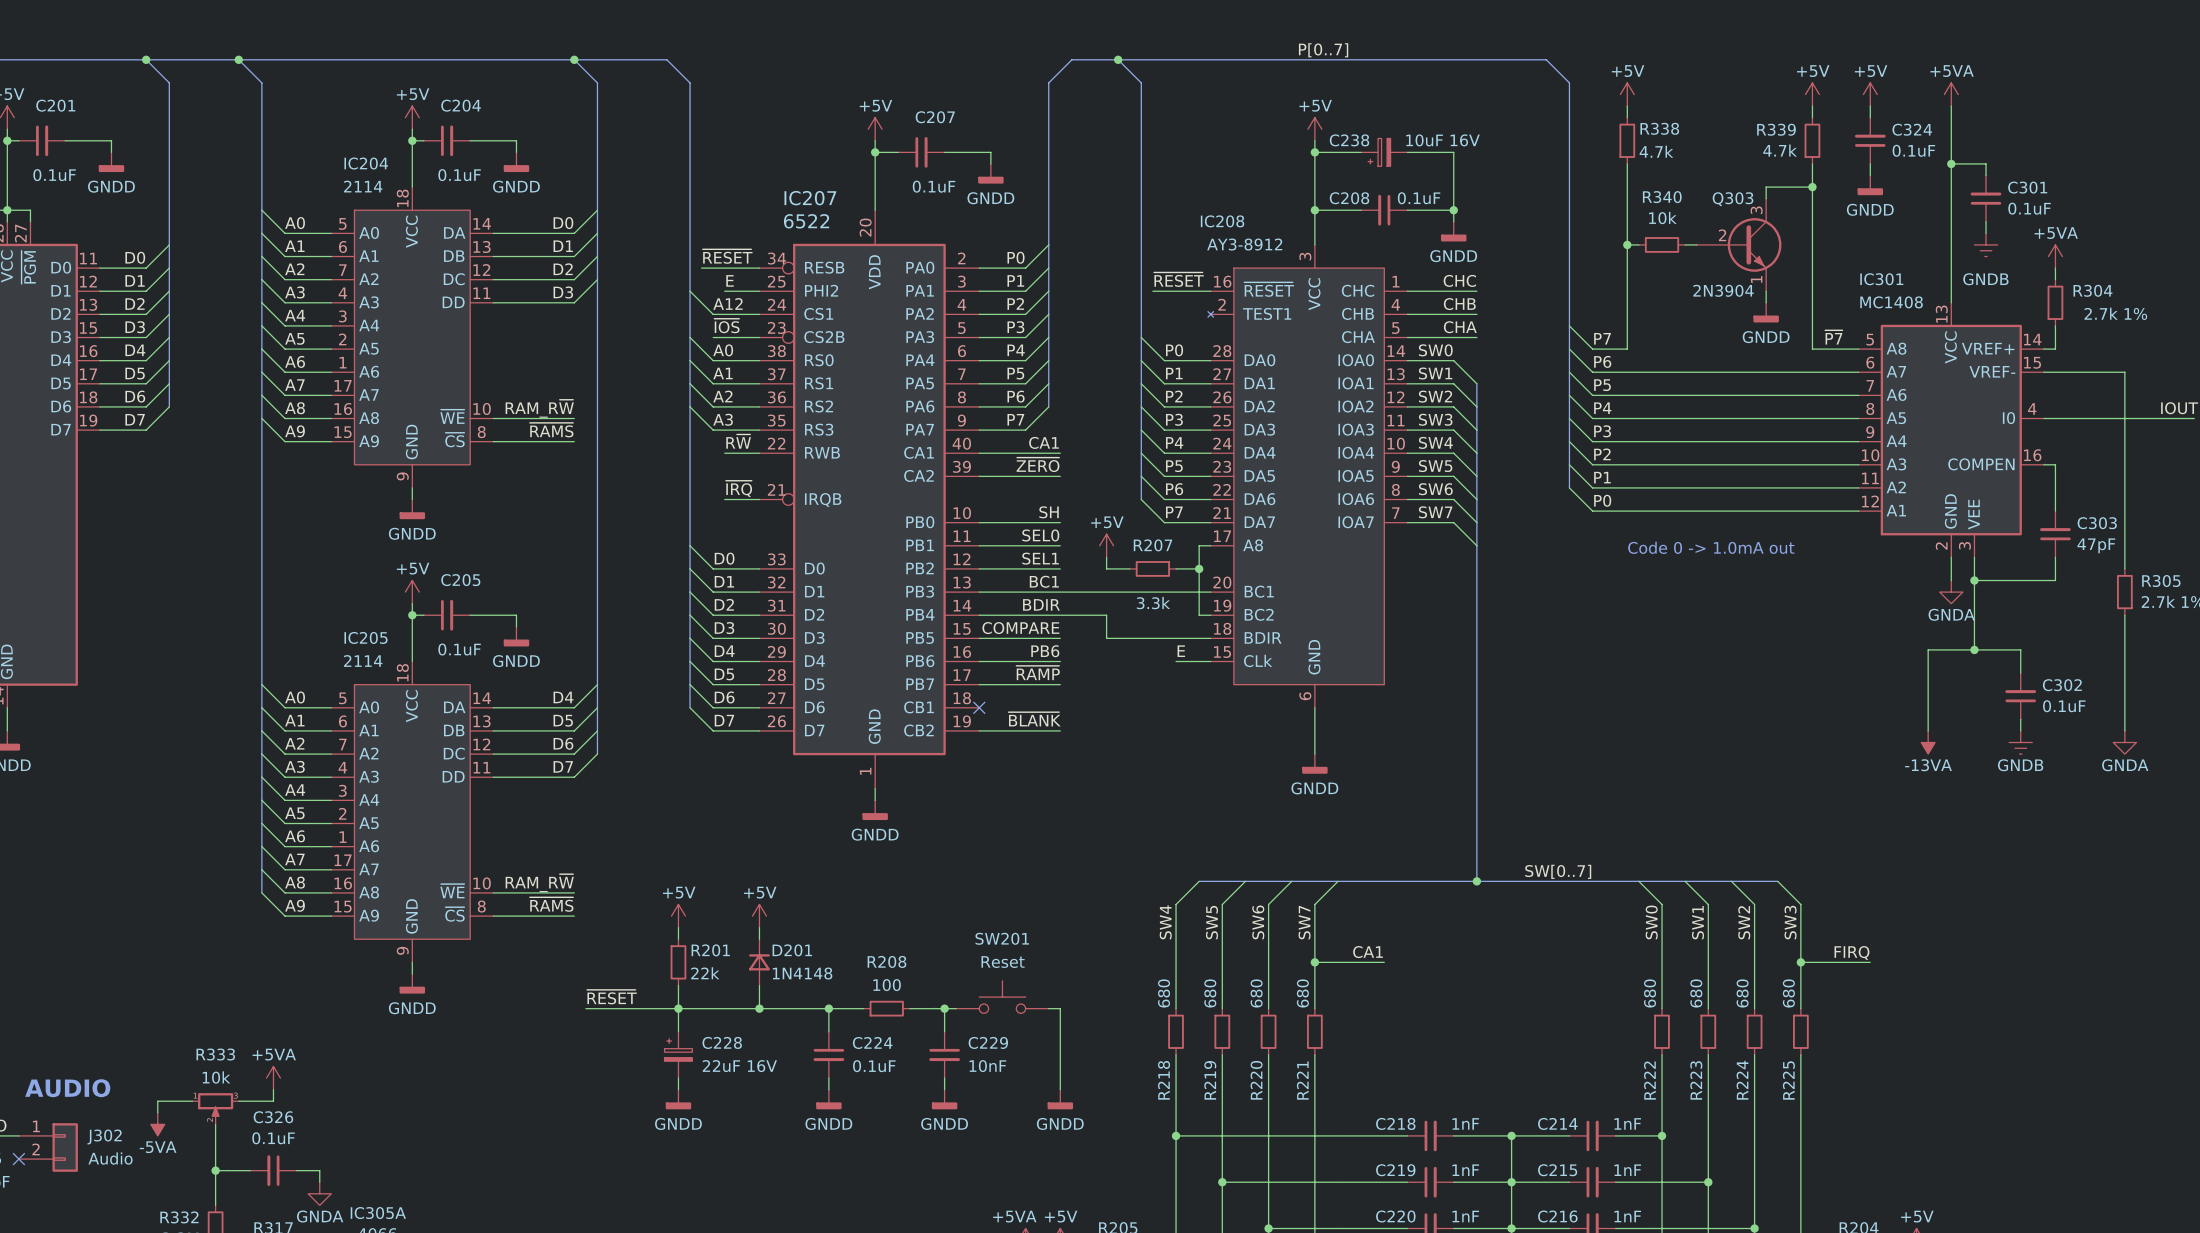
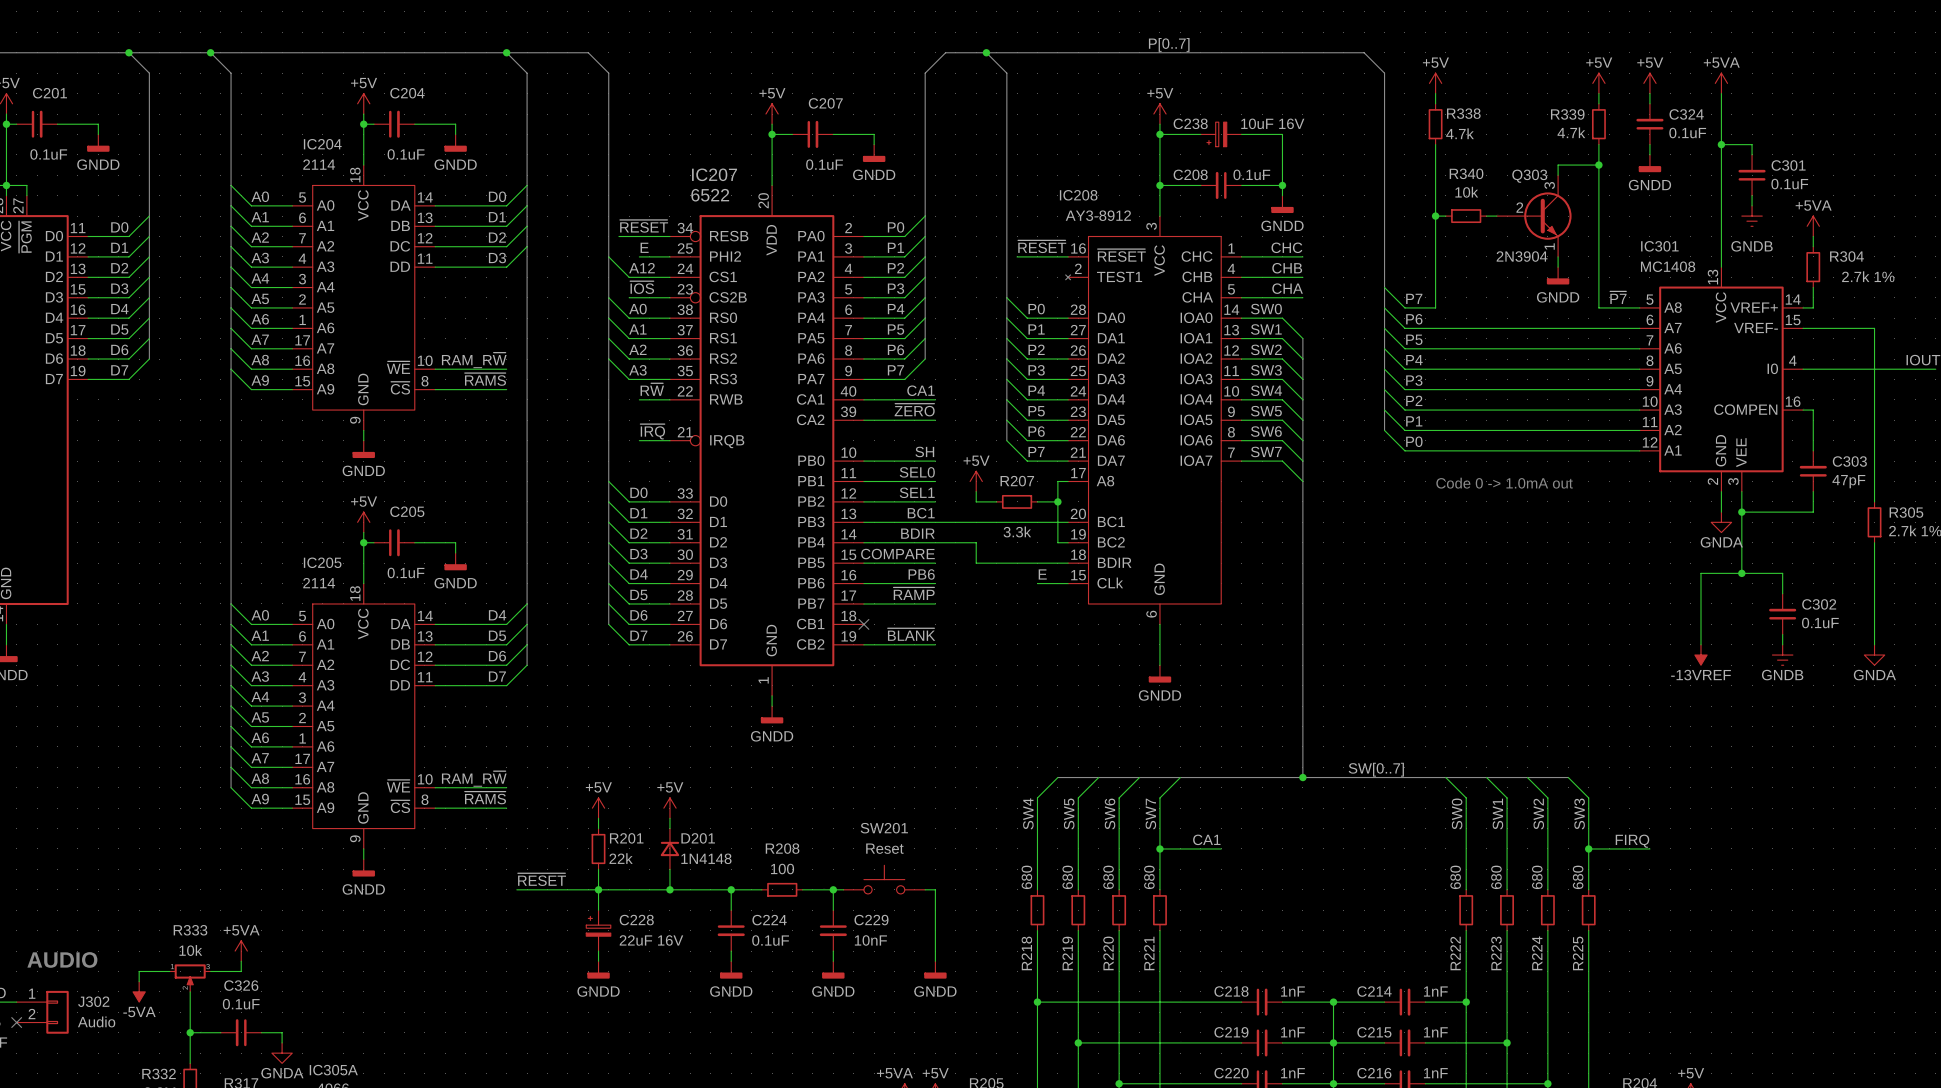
power symbol: -13VA (1928, 742) -> -13VREF (1700, 655)

